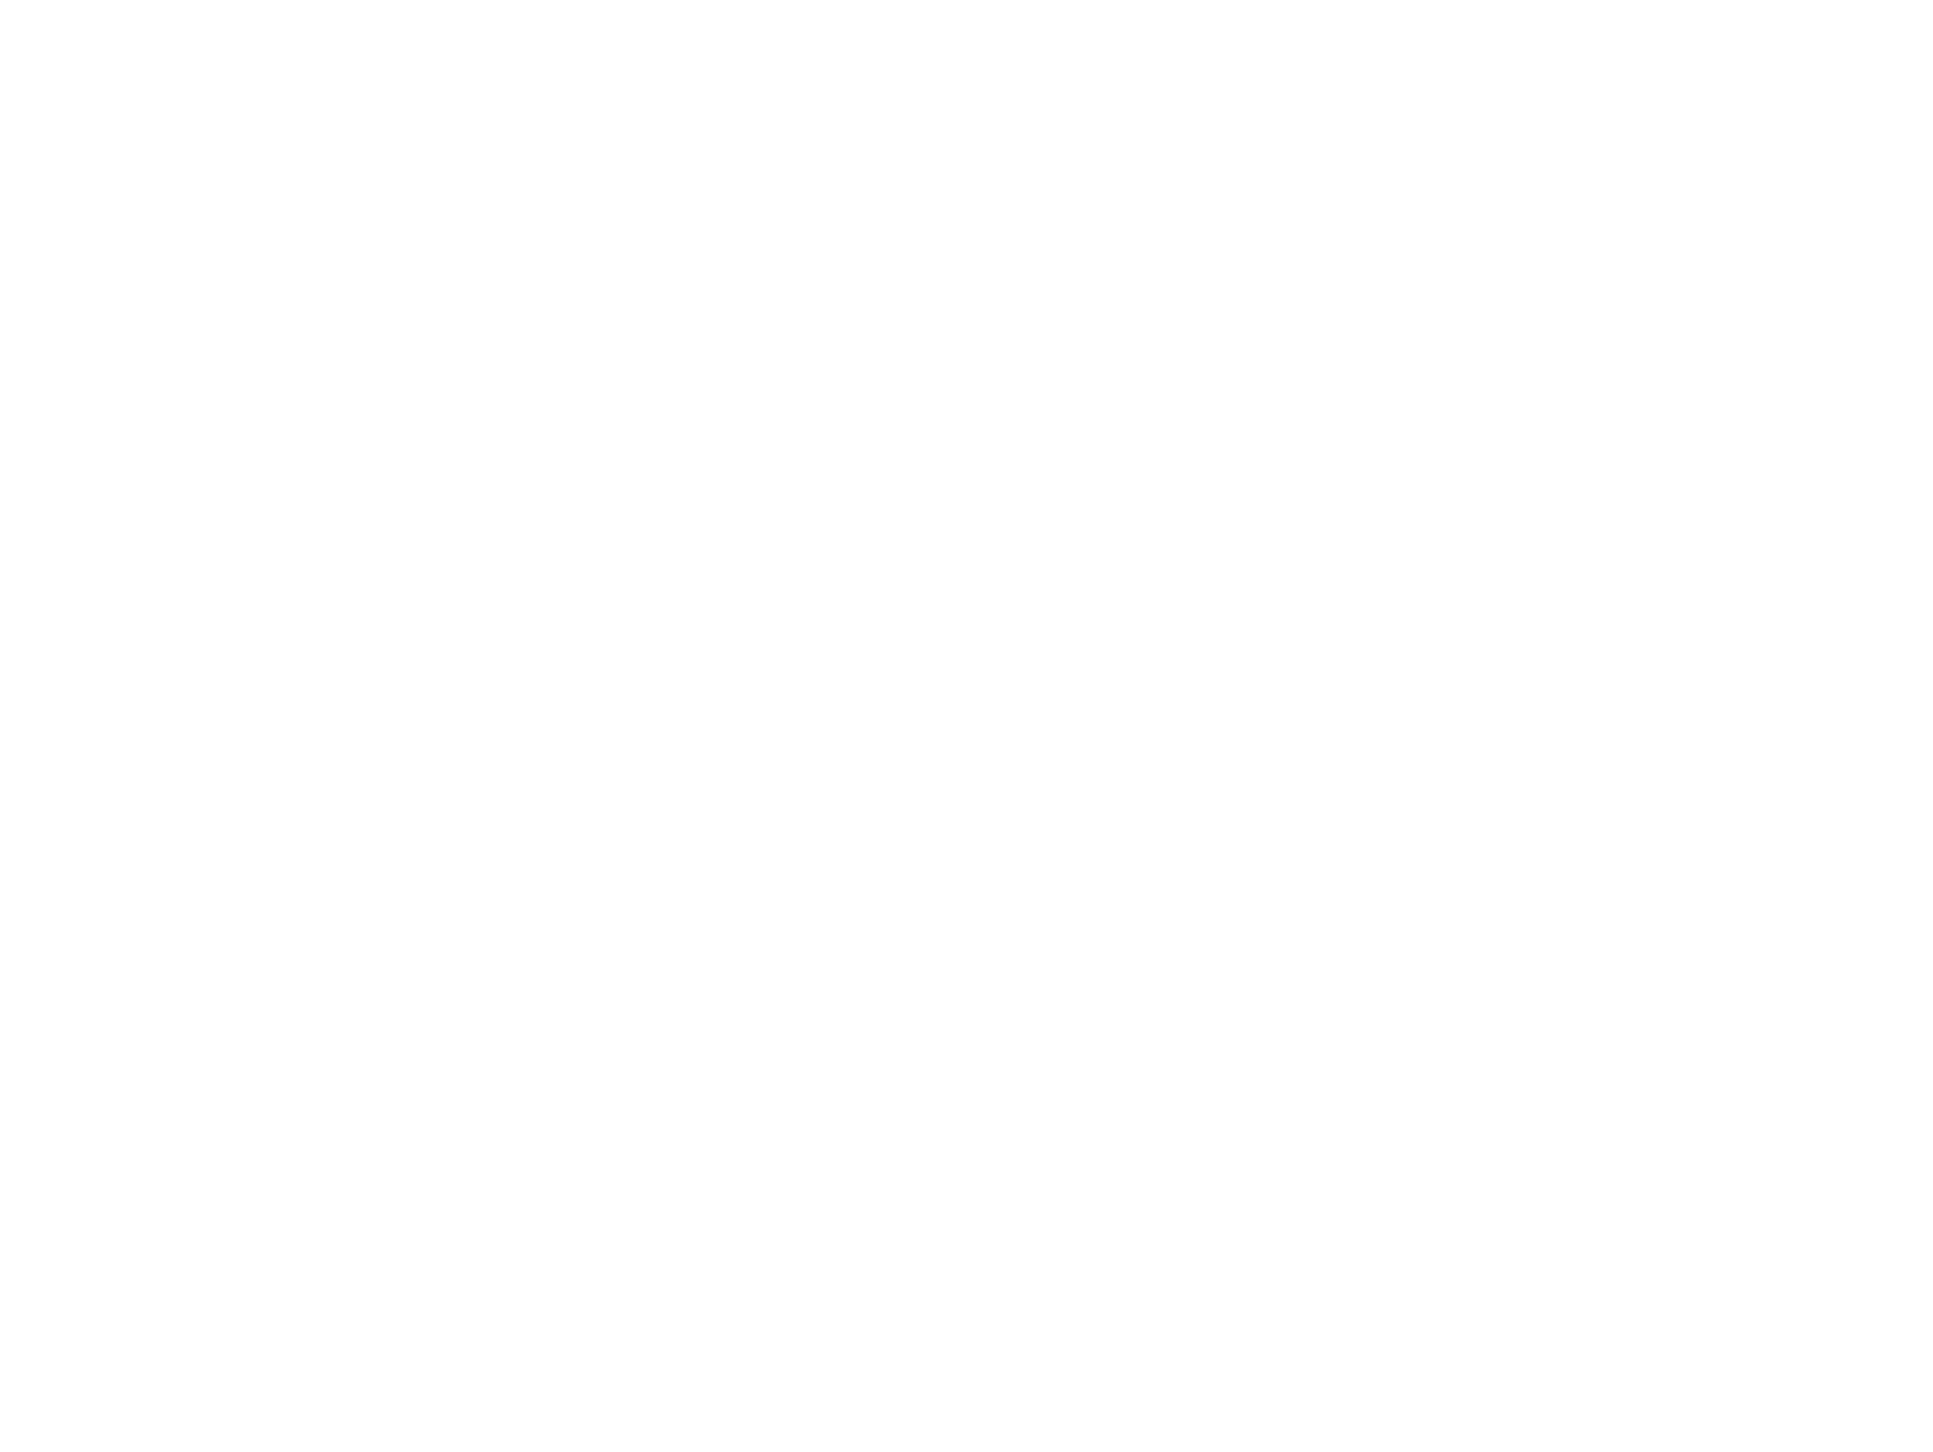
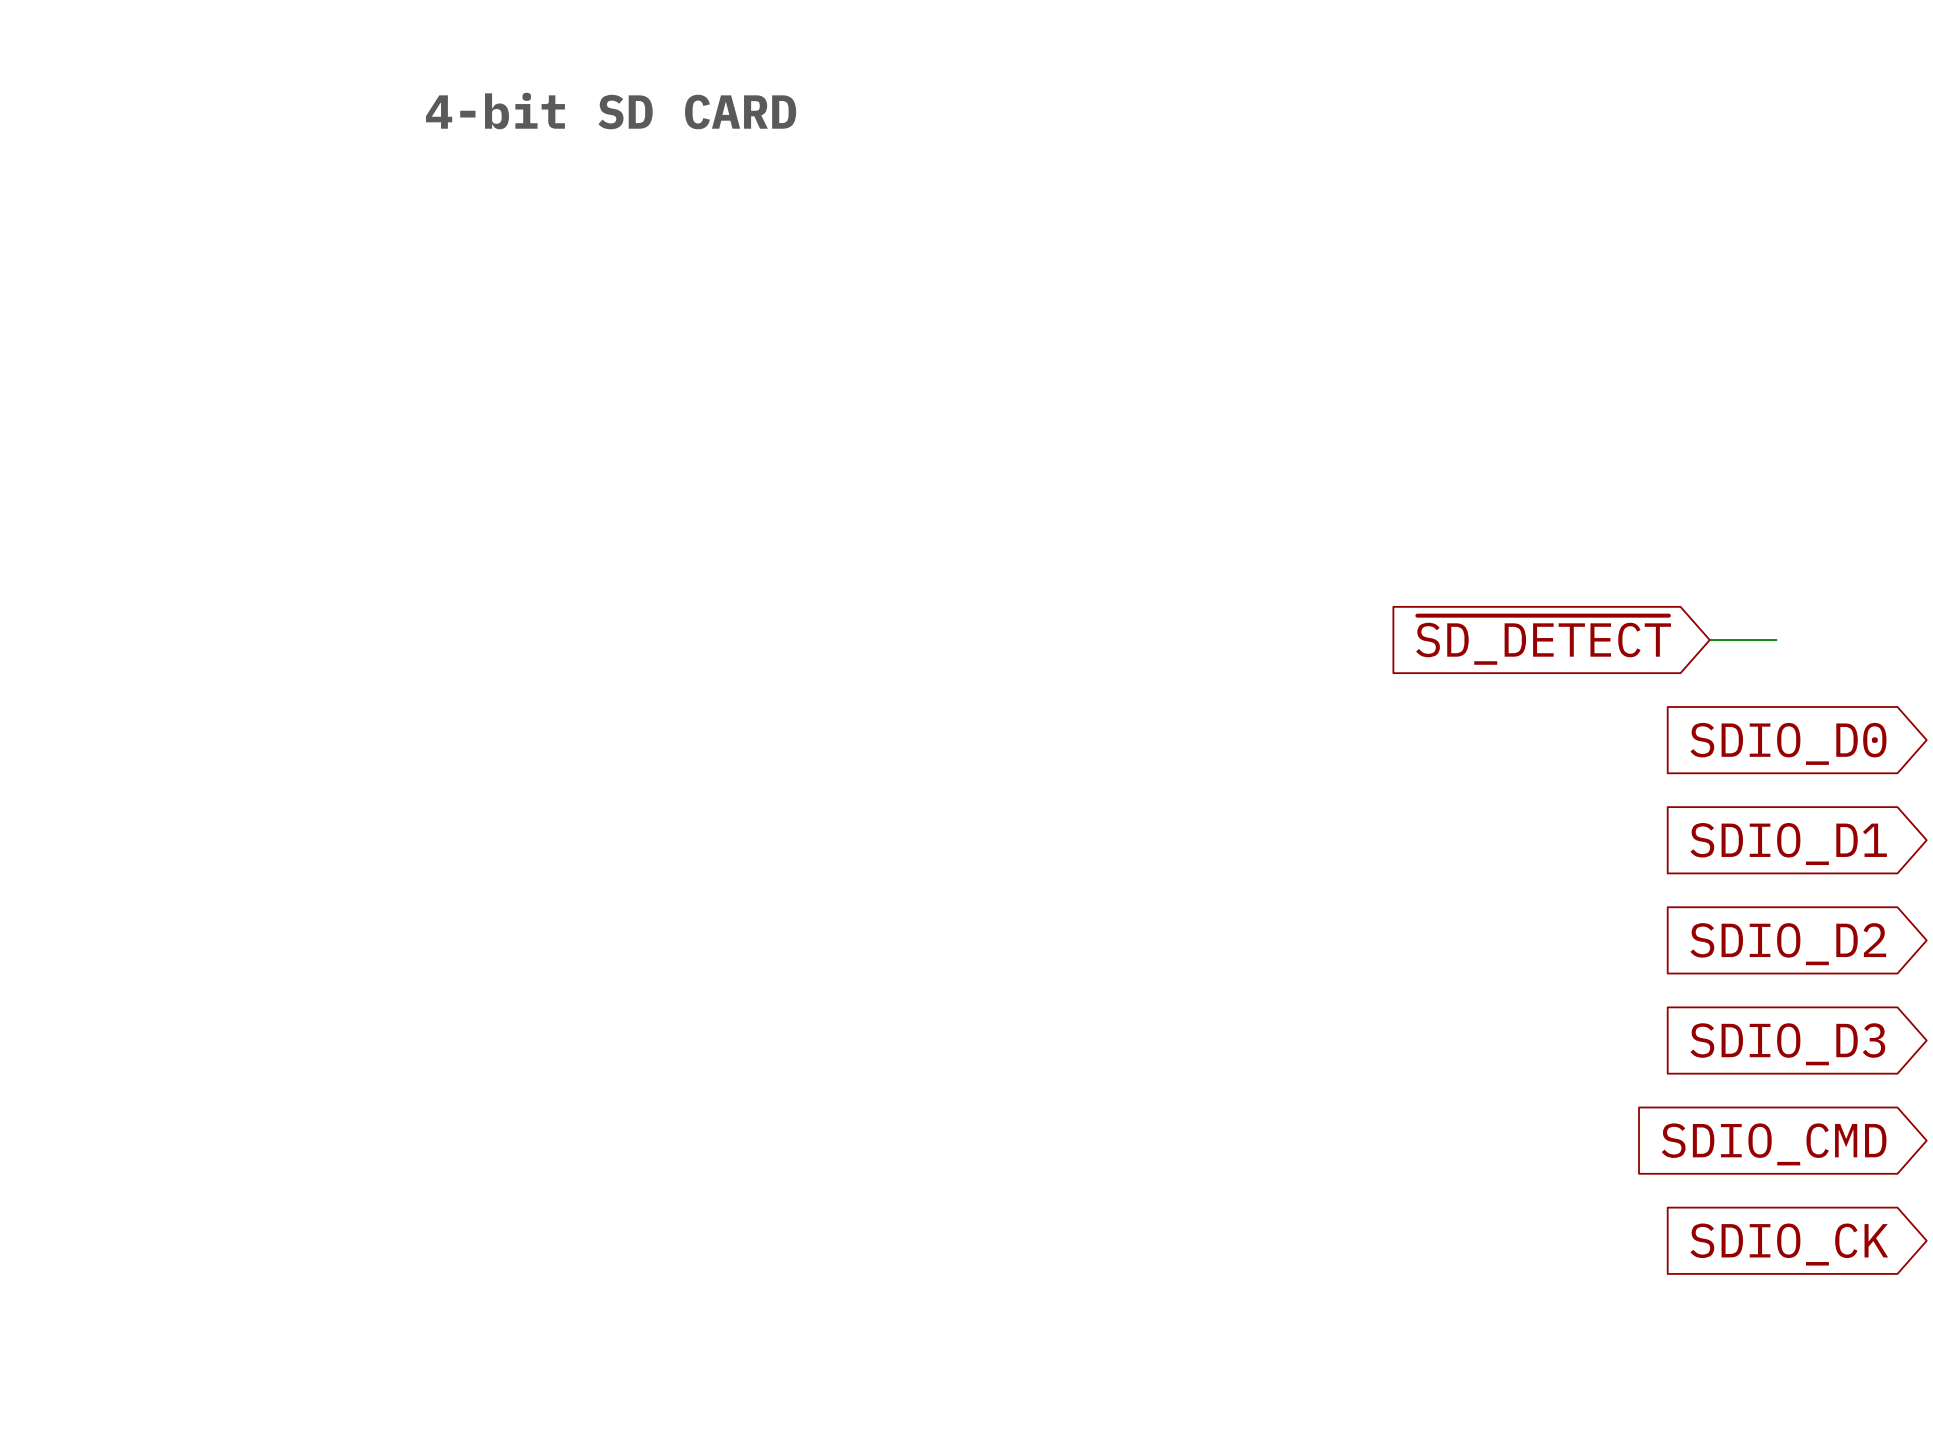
text: none -> 4-bit SD CARD (611, 111)
global label: none -> ~{SD_DETECT} (1543, 640)
wire: none -> (1709, 640) (1776, 640)
global label: none -> SDIO_D0 (1788, 743)
global label: none -> SDIO_D1 (1788, 844)
global label: none -> SDIO_D2 (1788, 944)
global label: none -> SDIO_D3 (1787, 1044)
global label: none -> SDIO_CMD (1774, 1144)
global label: none -> SDIO_CK (1789, 1244)

